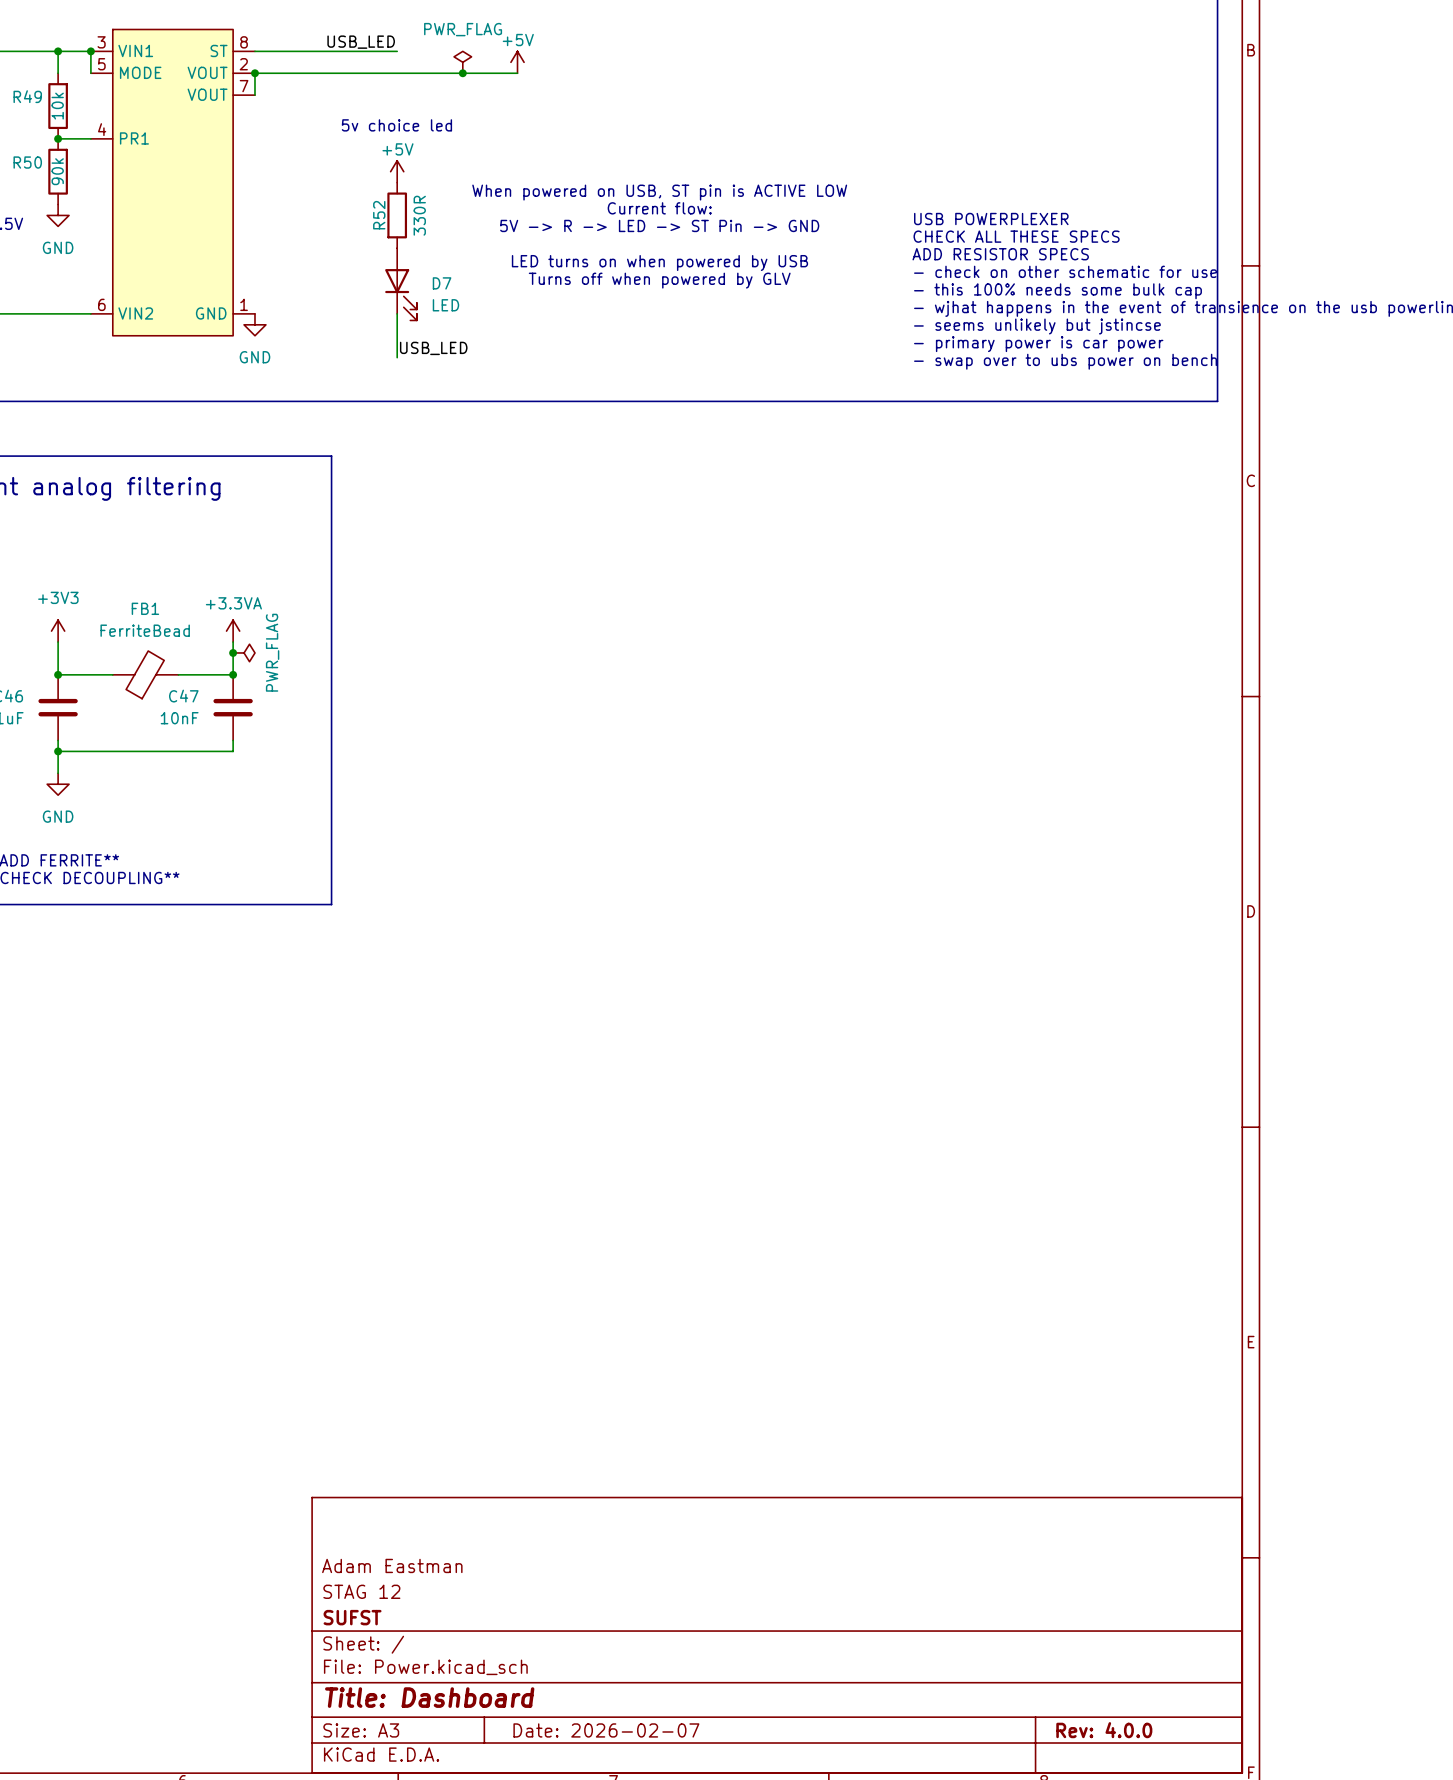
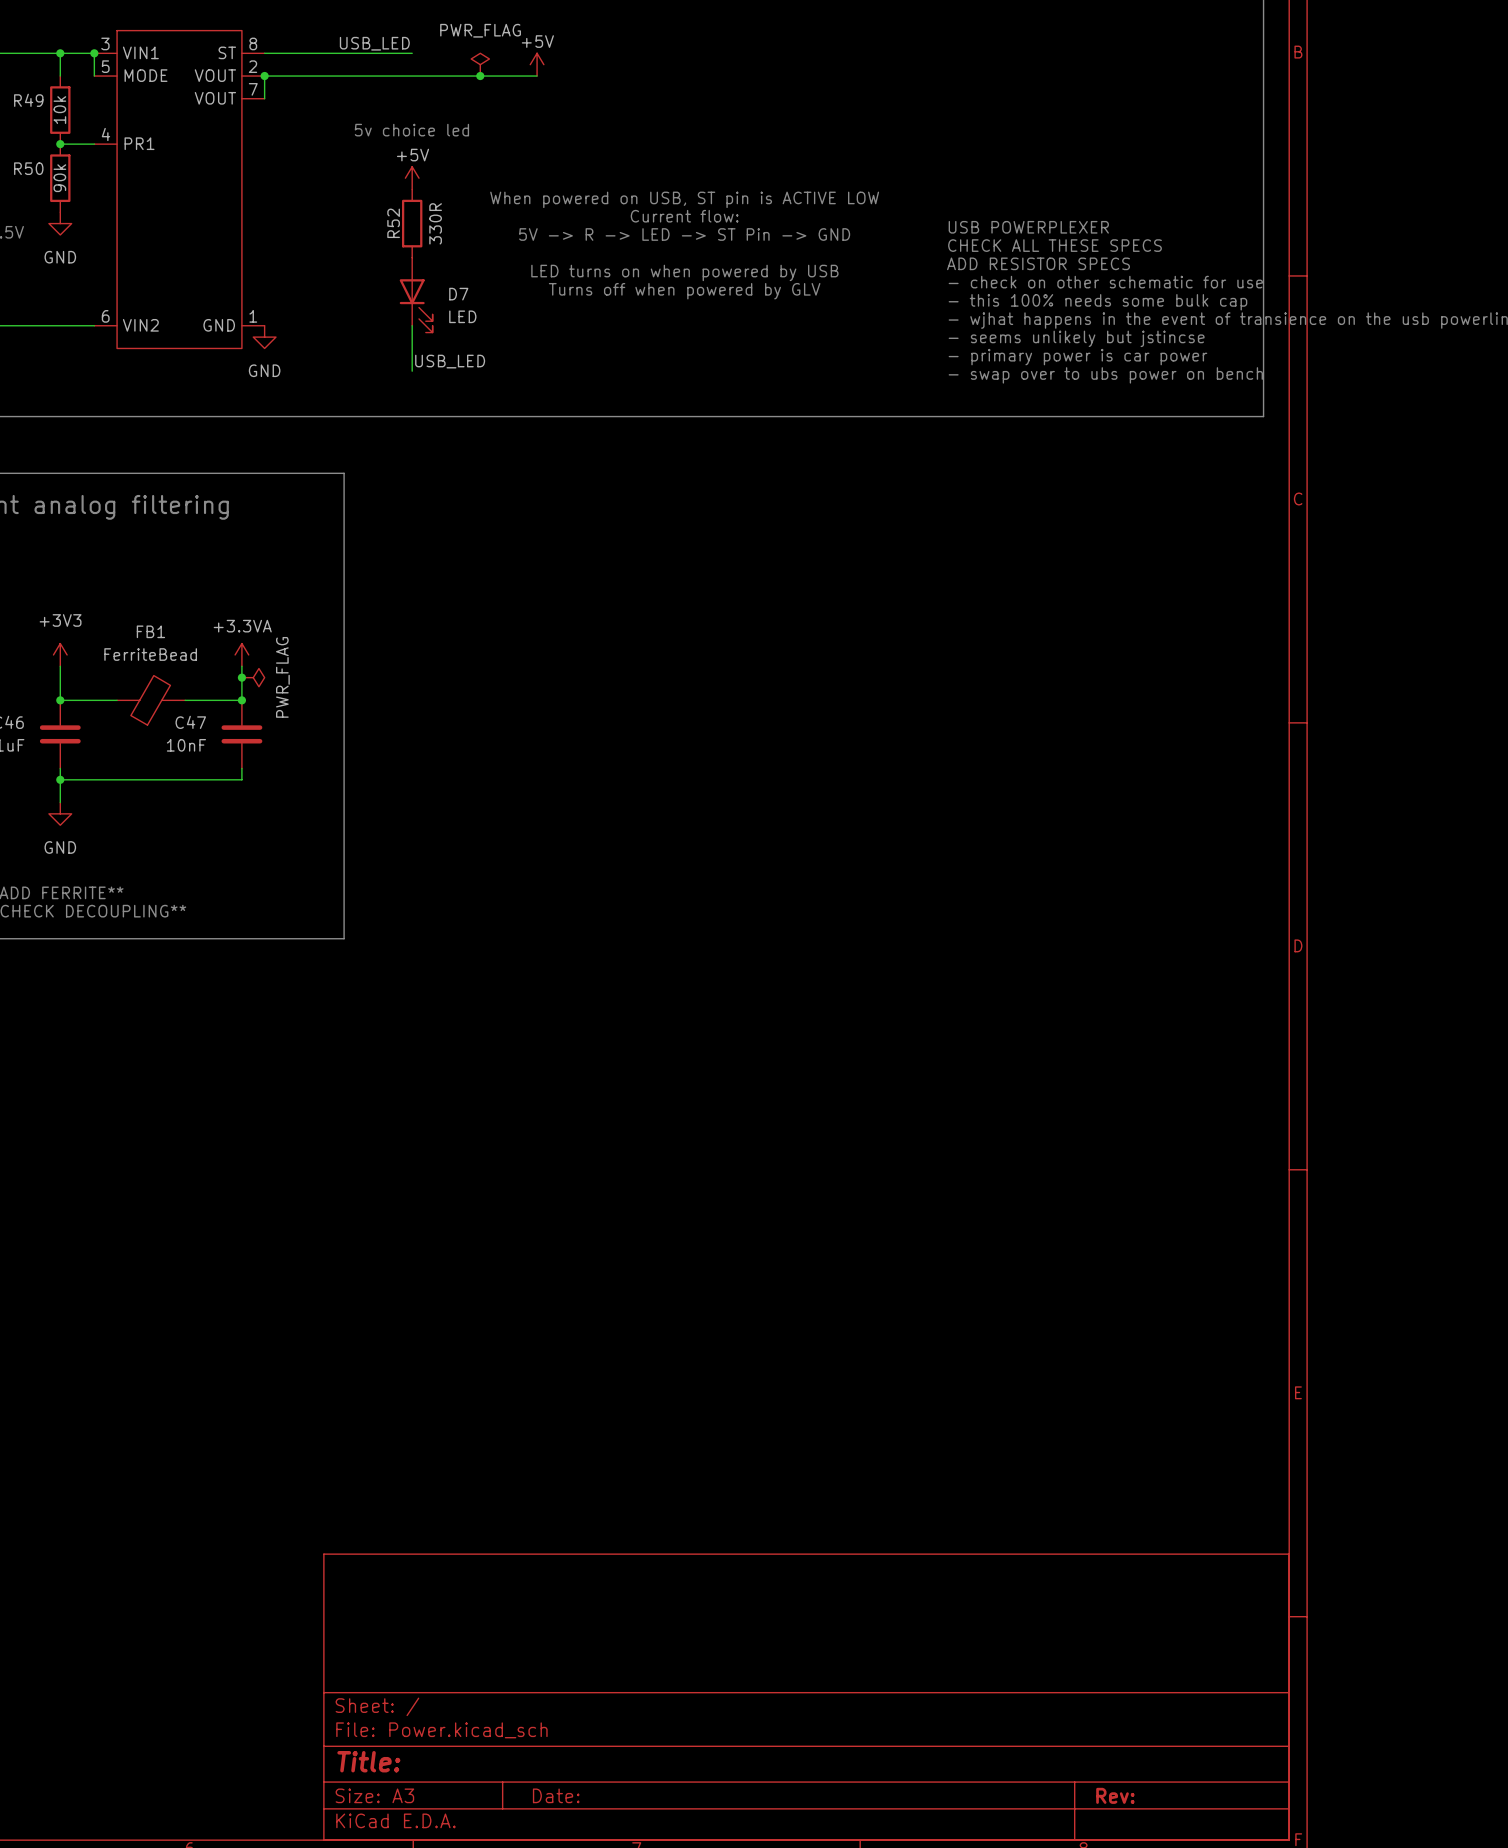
title block: Adam Eastman (392, 1565) -> none
title block: STAG 12 (361, 1591) -> none
title block: SUFST (352, 1617) -> none
title block: Title: Dashboard (429, 1697) -> Title: (368, 1761)
title block: Date: 2026-02-07 (606, 1730) -> Date: (556, 1795)
title block: Rev: 4.0.0 (1104, 1730) -> Rev: (1115, 1795)

